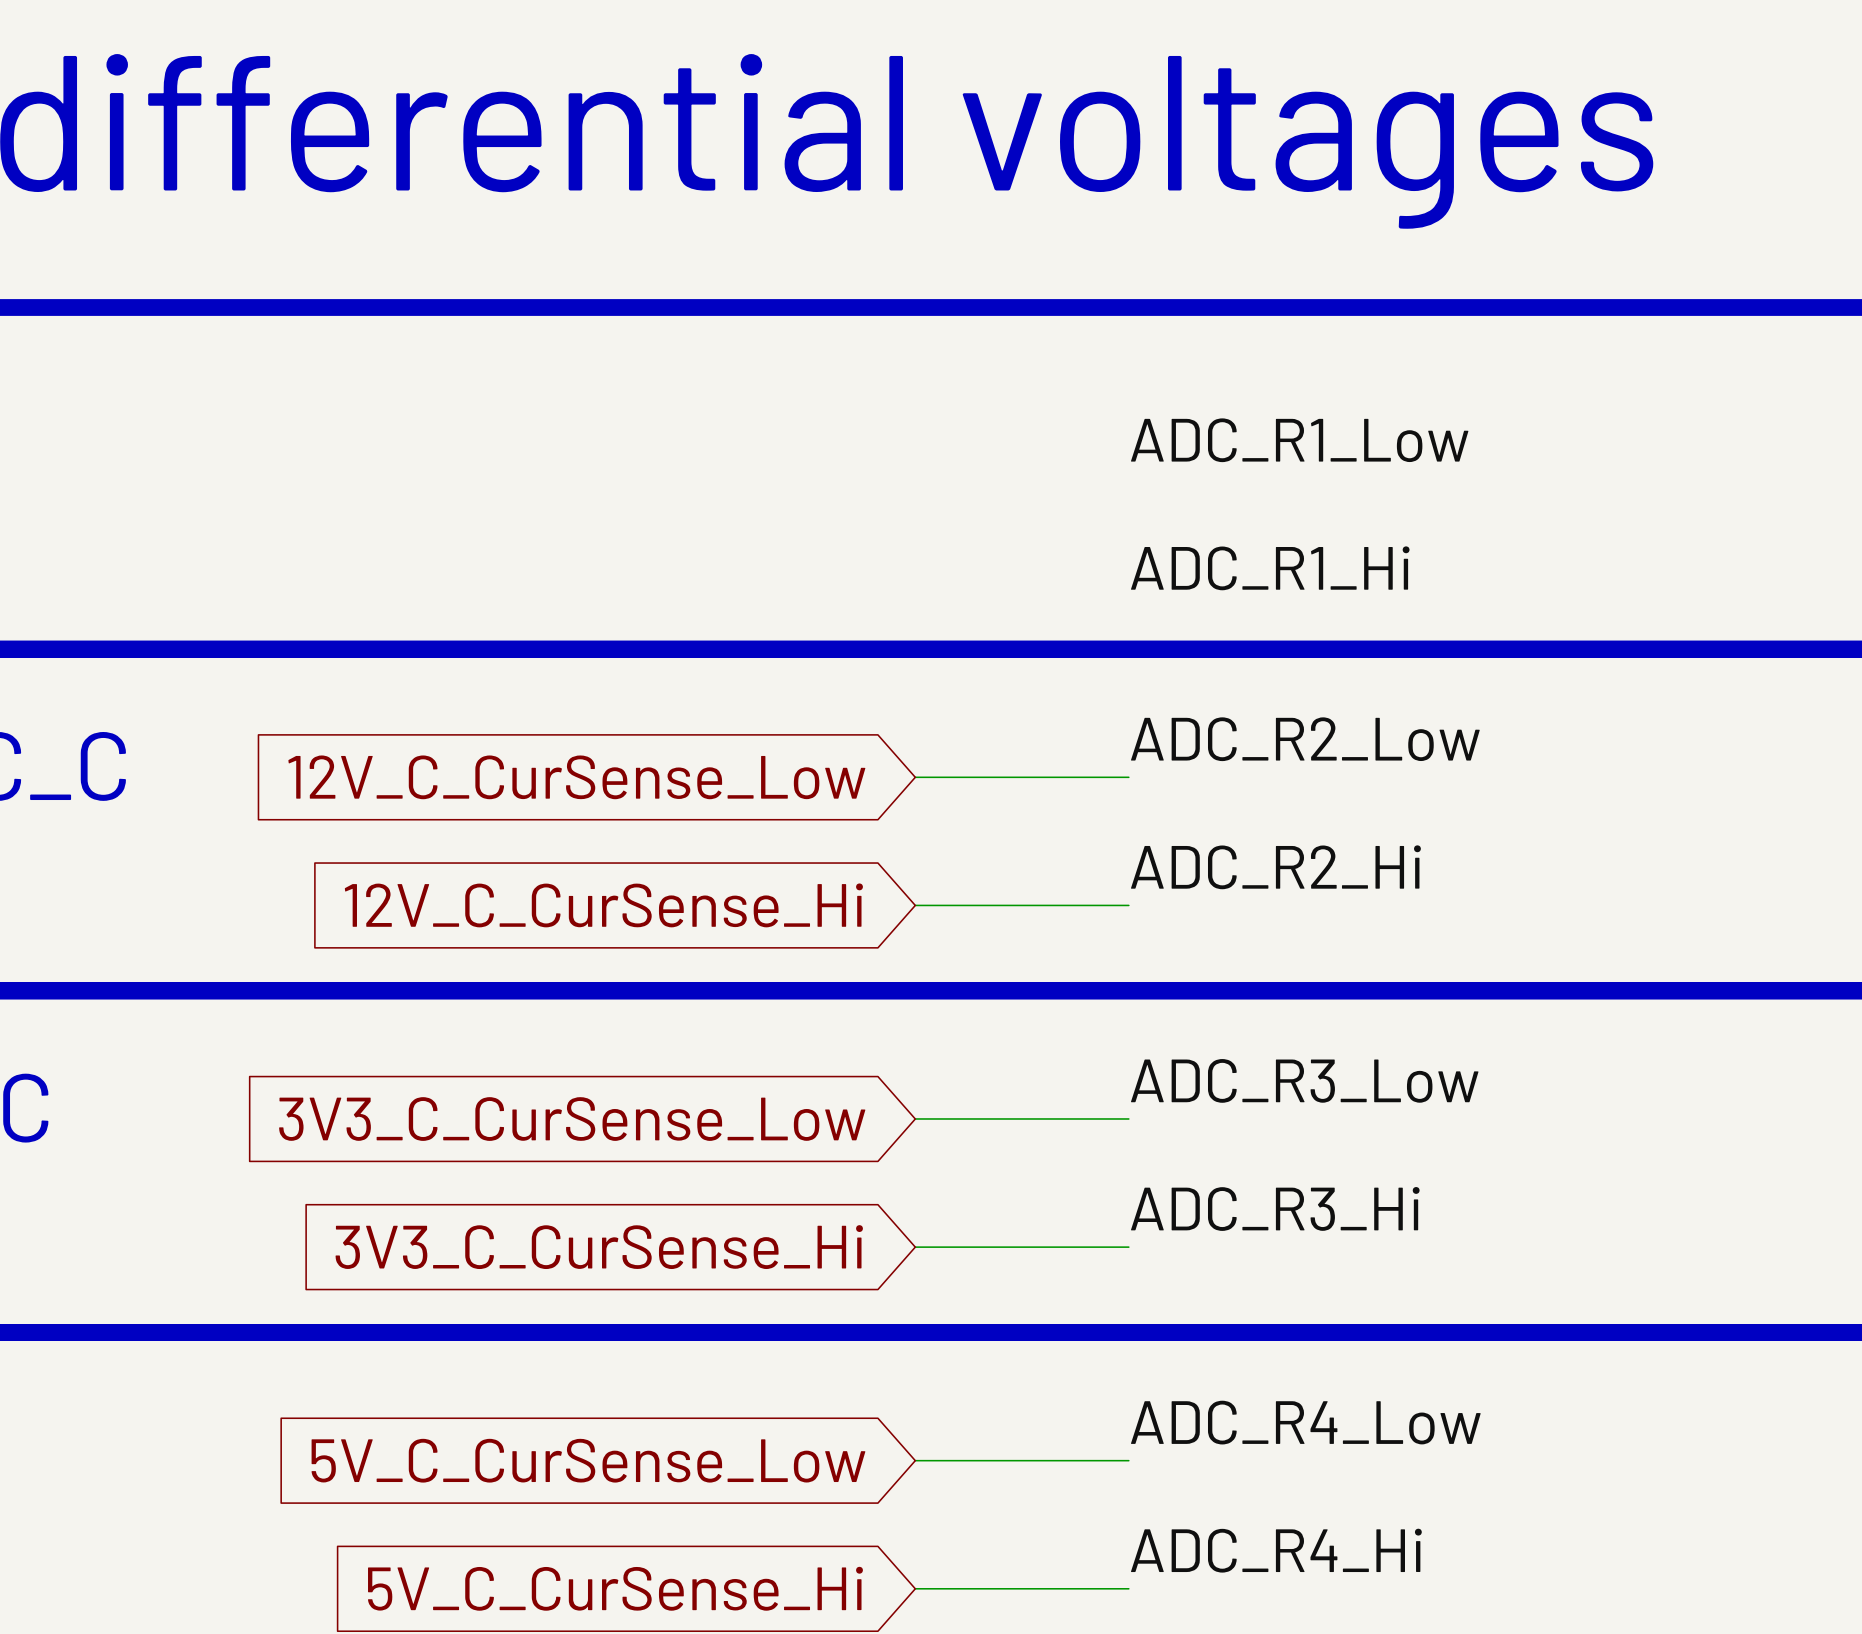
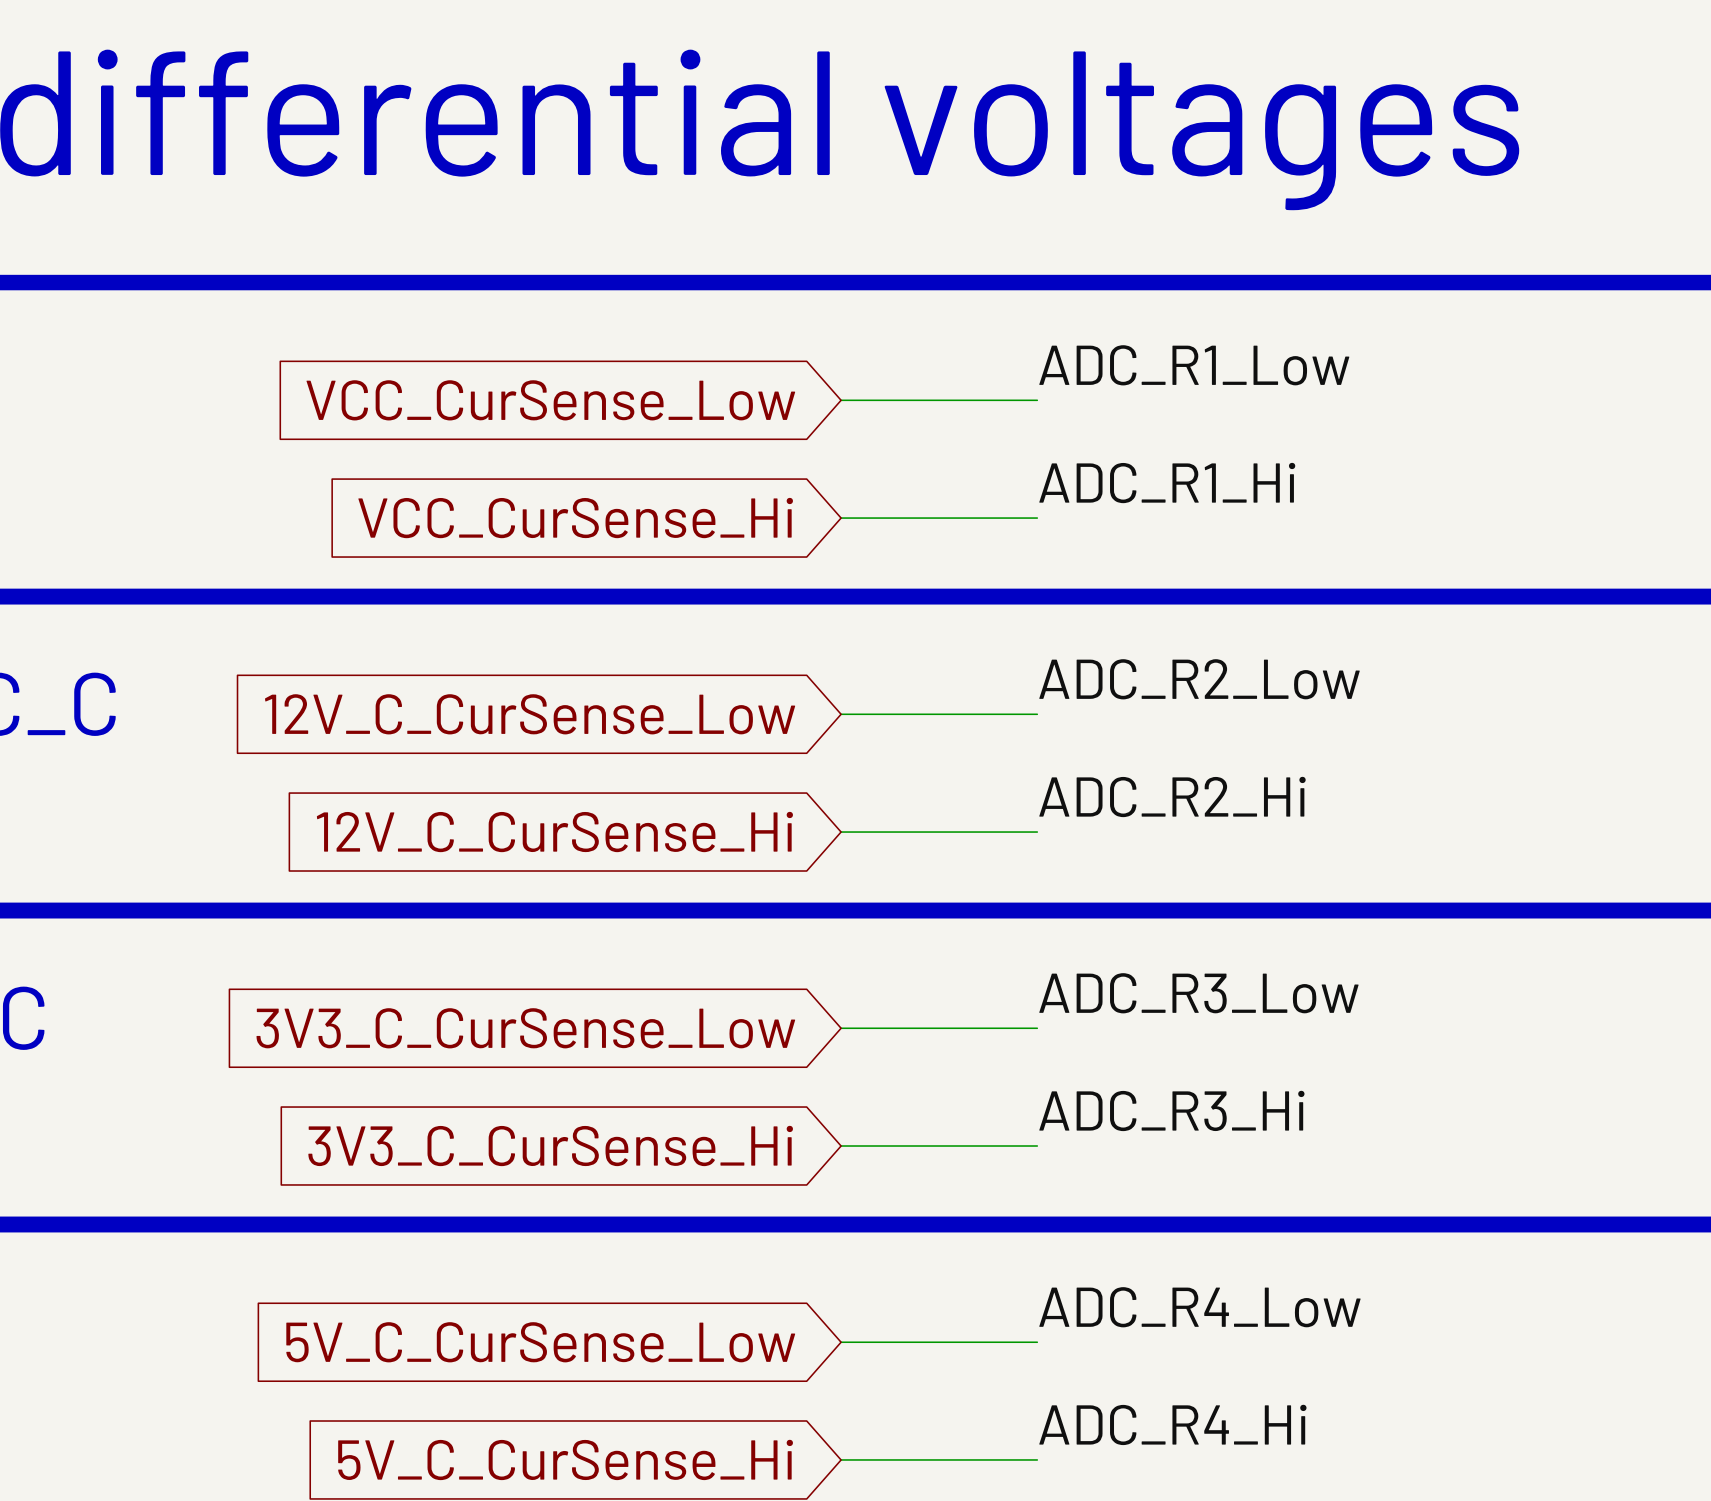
global label: none -> VCC_CurSense_Low (550, 400)
wire: none -> (841, 400) (1037, 400)
label position: ADC_R1_Low (1299, 440) -> ADC_R1_Low (1194, 365)
global label: none -> VCC_CurSense_Hi (575, 518)
wire: none -> (841, 518) (1037, 518)
label position: ADC_R1_Hi (1270, 568) -> ADC_R1_Hi (1167, 483)

